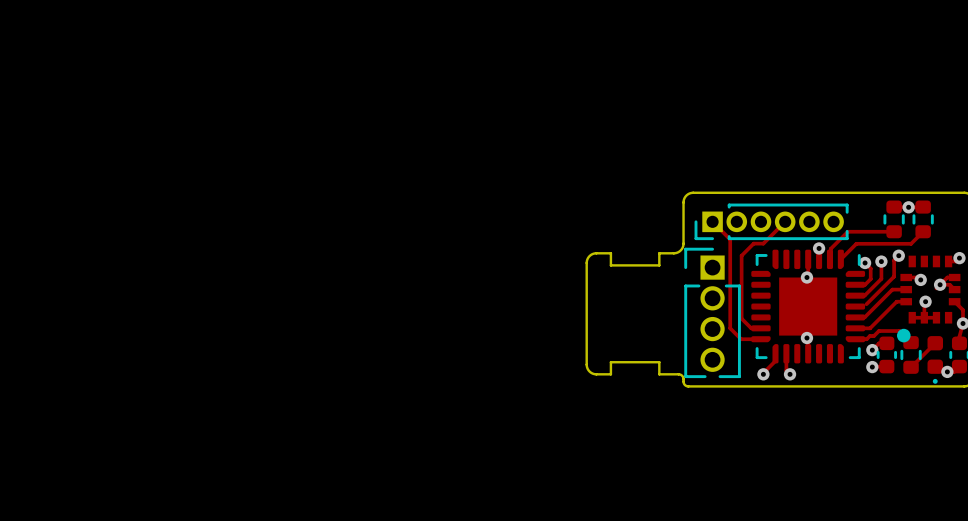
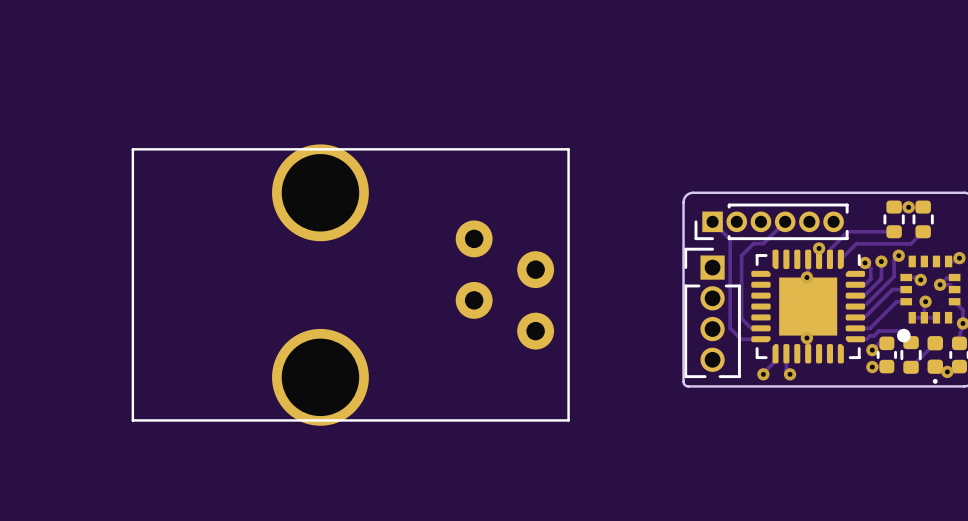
board edge: (683, 243) (681, 249) (677, 252) (659, 253) (659, 265) (610, 265) (610, 253) (593, 253) (588, 257) (586, 262) (586, 364) (588, 370) (595, 374) (610, 374) (610, 362) (659, 362) (659, 374) (679, 374) (683, 379) -> (683, 243) (683, 379)
part: none -> (350, 285)

